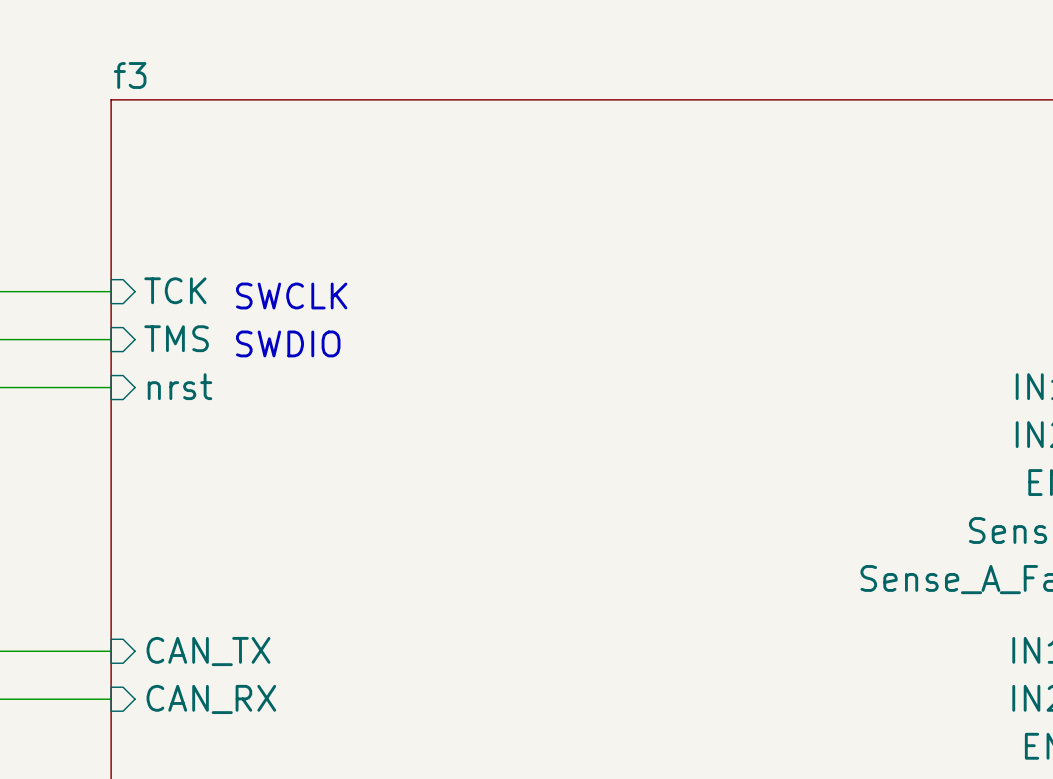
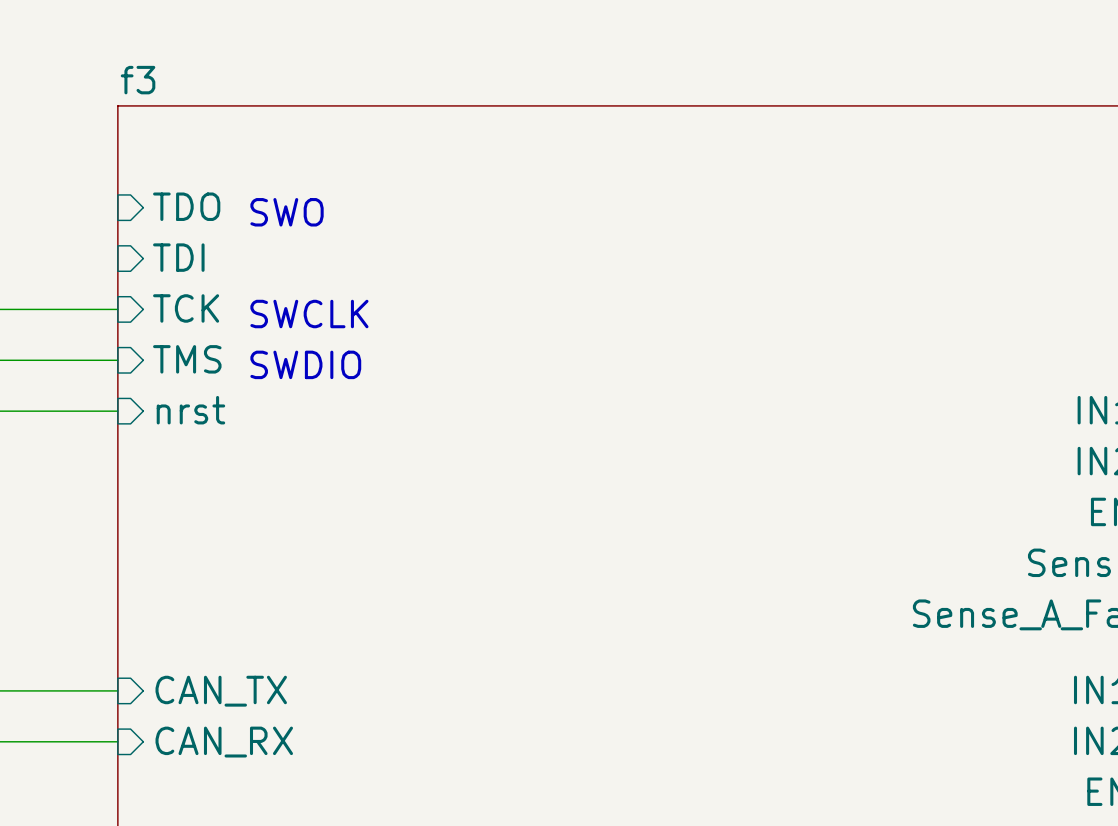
sheet pin: none -> TDO (186, 206)
text: none -> SWO (287, 212)
sheet pin: none -> TDI (178, 257)

